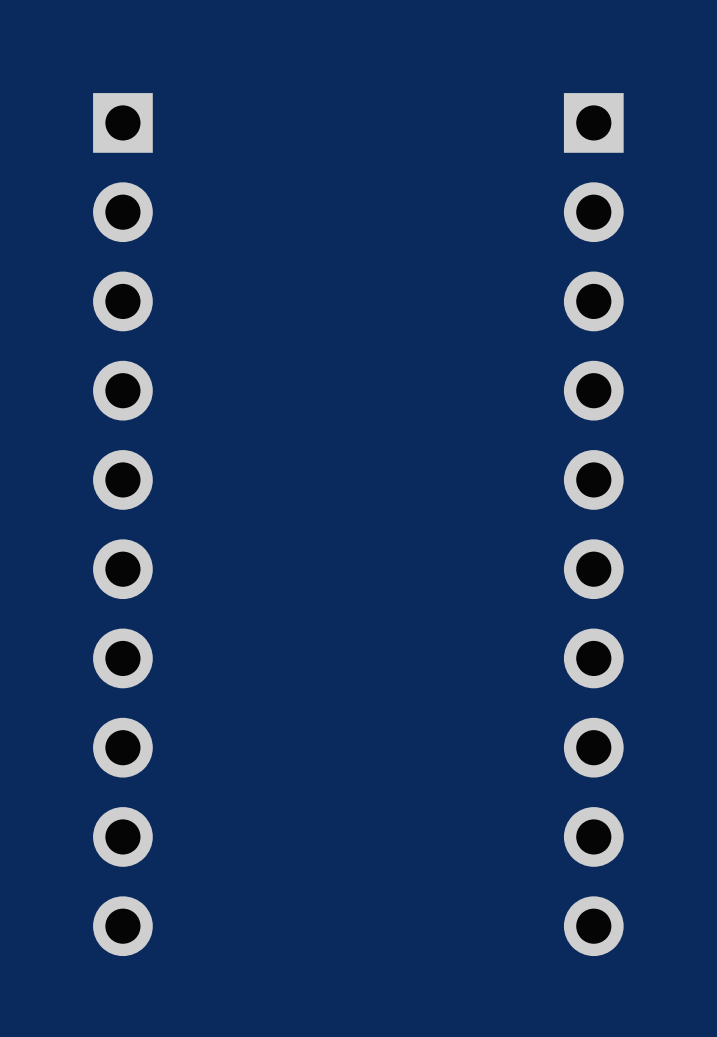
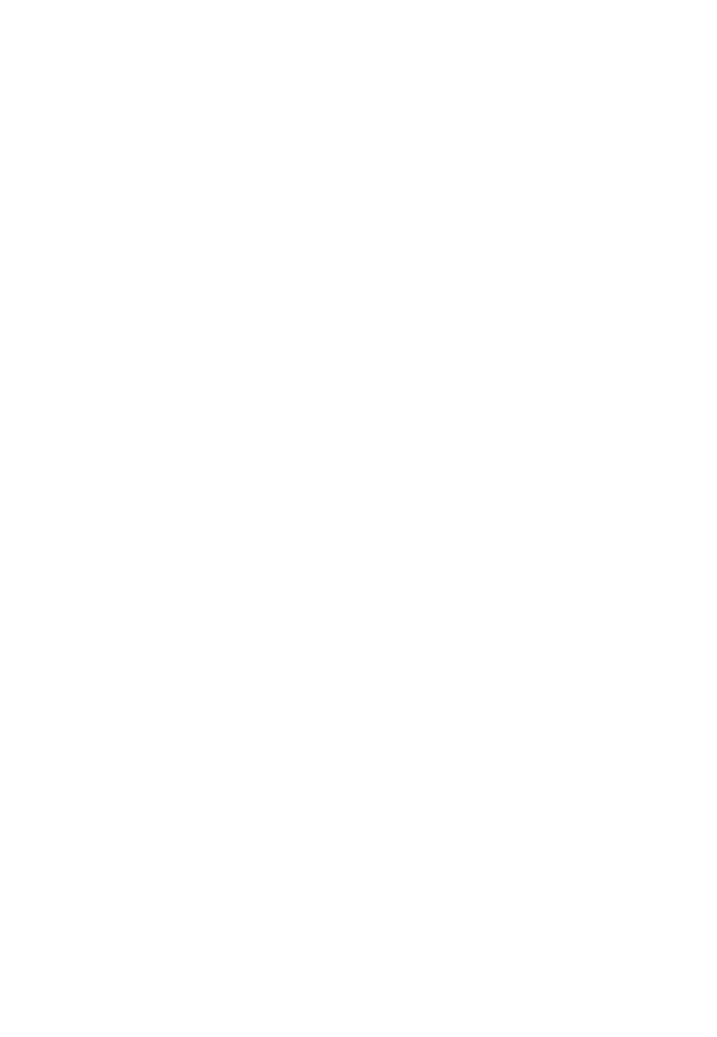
part: (122, 524) -> none
part: (593, 524) -> none

